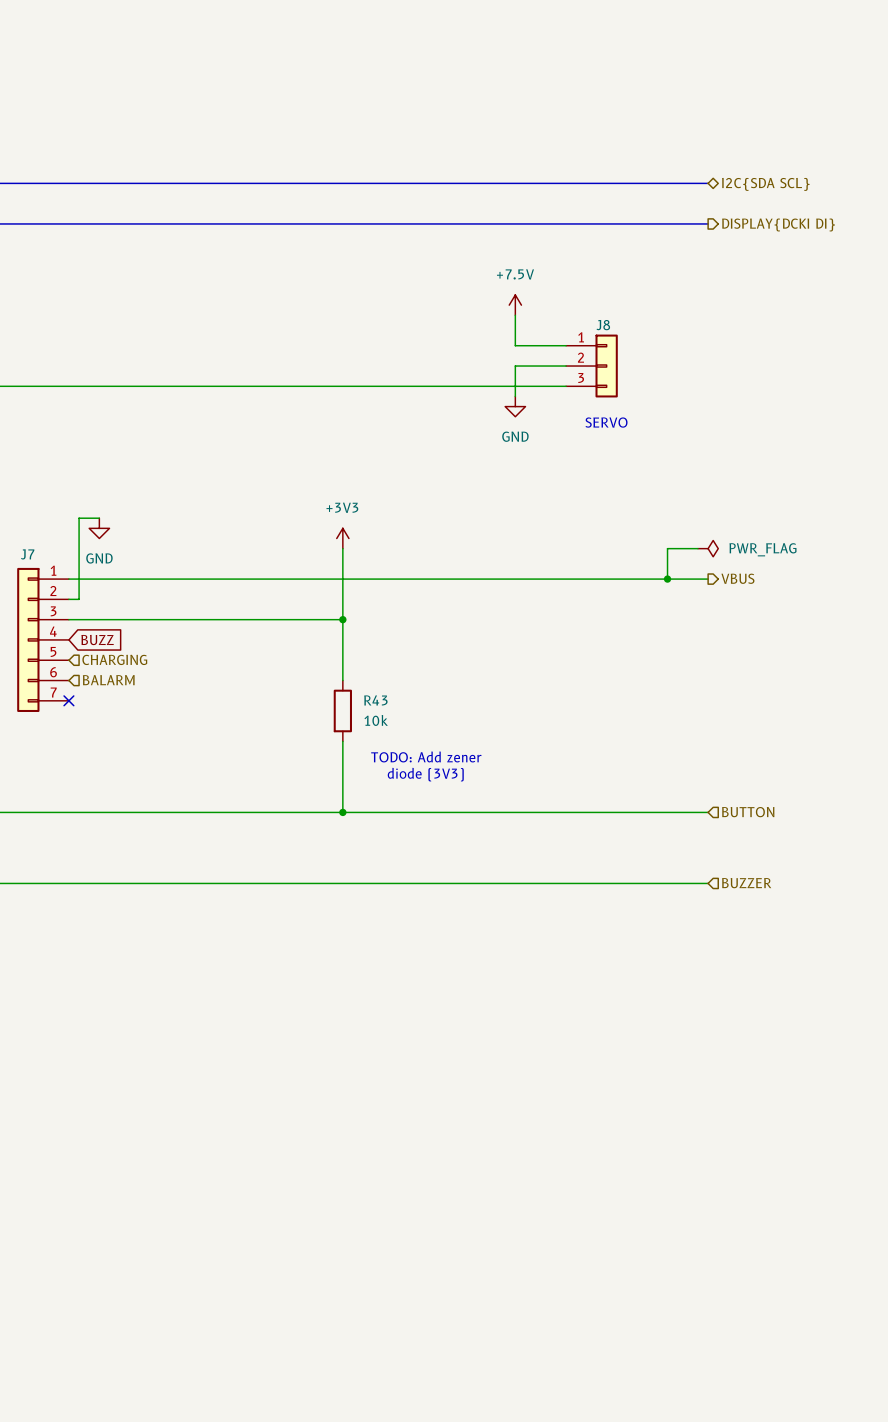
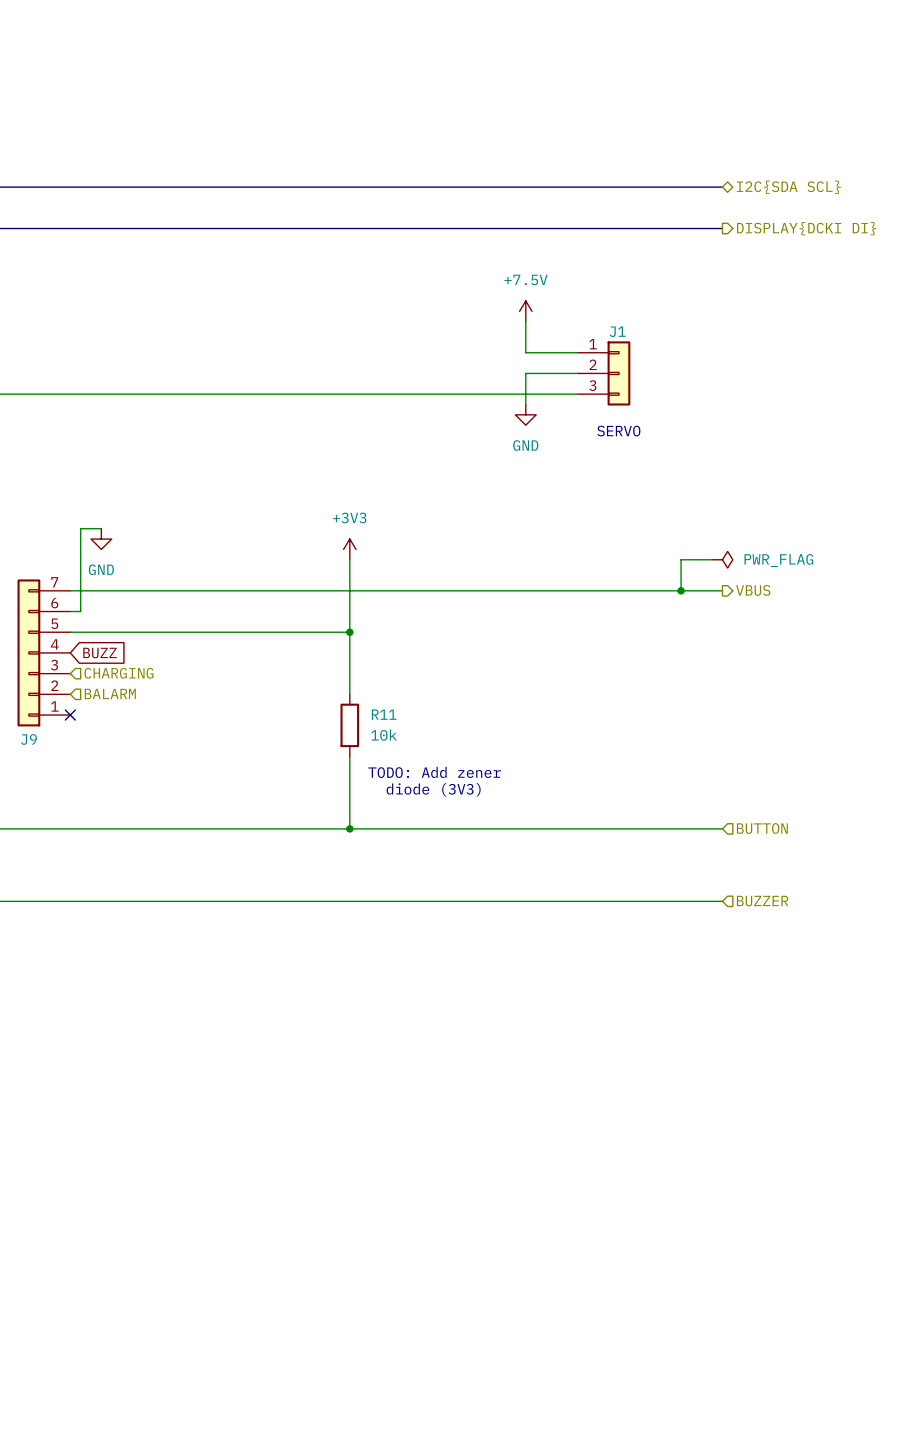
J8 name: J8 (603, 325) -> J1 (617, 331)
J7 name: J7 (27, 554) -> J9 (28, 739)
J7 flip: as is (28, 639) -> up-down (28, 652)
R43 name: R43 (375, 700) -> R11 (384, 714)

